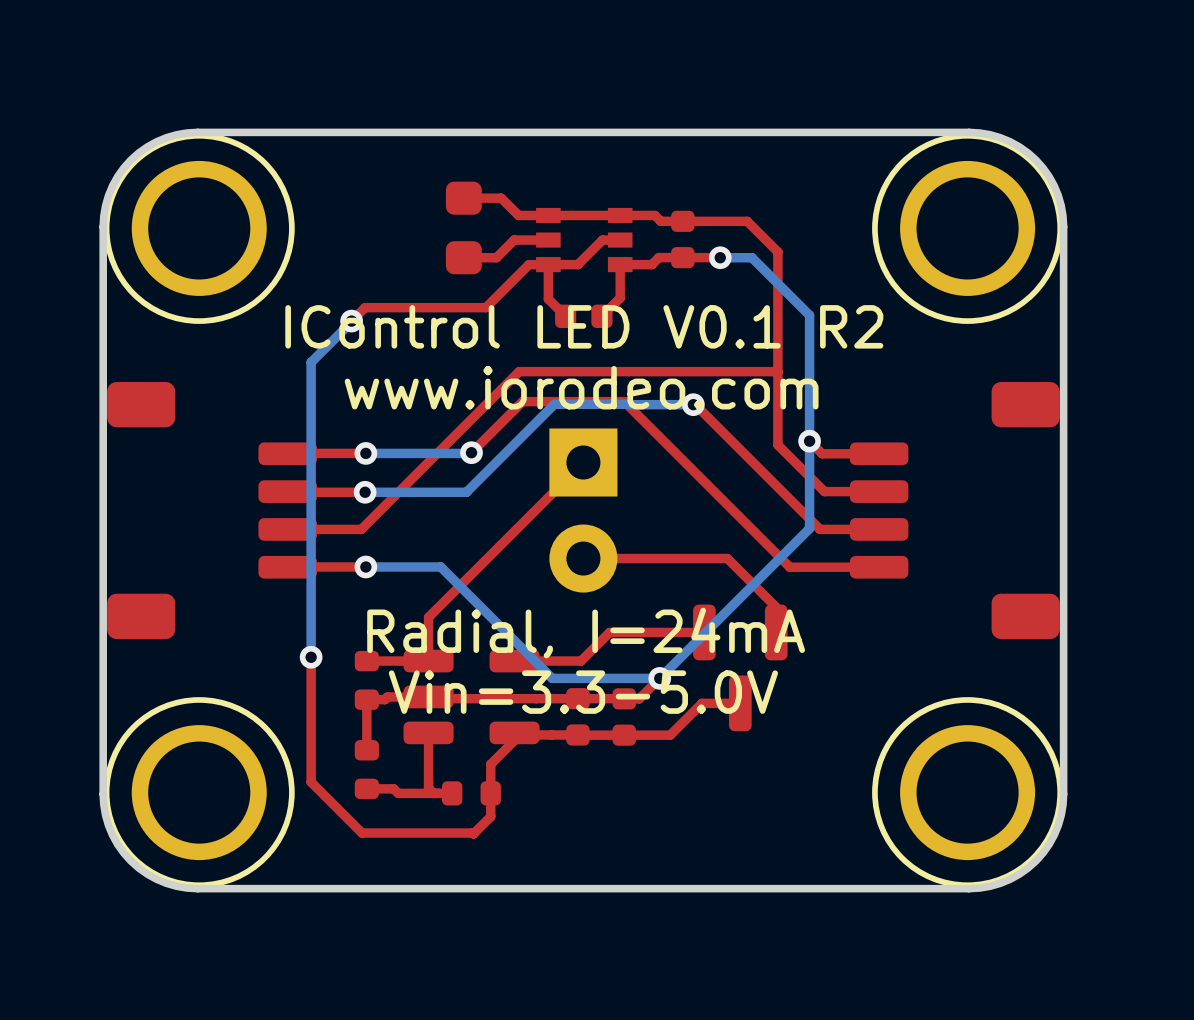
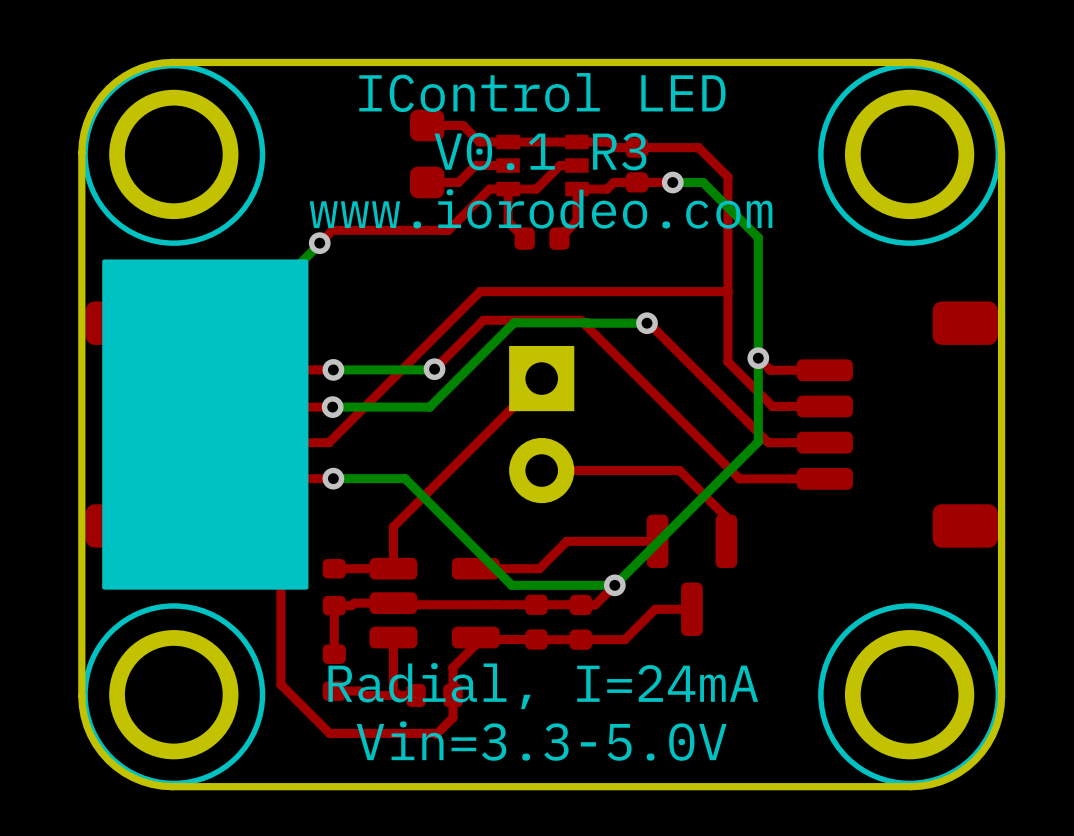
text: none -> IControl LED (542, 92)
text: none -> V0.1 R3 (540, 151)
text: IControl LED V0.1 R2 (584, 326) -> none
drawing: none -> [102, 259, 309, 590]
text position: www.iorodeo.com (581, 387) -> www.iorodeo.com (541, 208)
text position: Radial, I=24mA (586, 633) -> Radial, I=24mA (543, 686)
text position: Vin=3.3-5.0V (583, 692) -> Vin=3.3-5.0V (541, 741)

